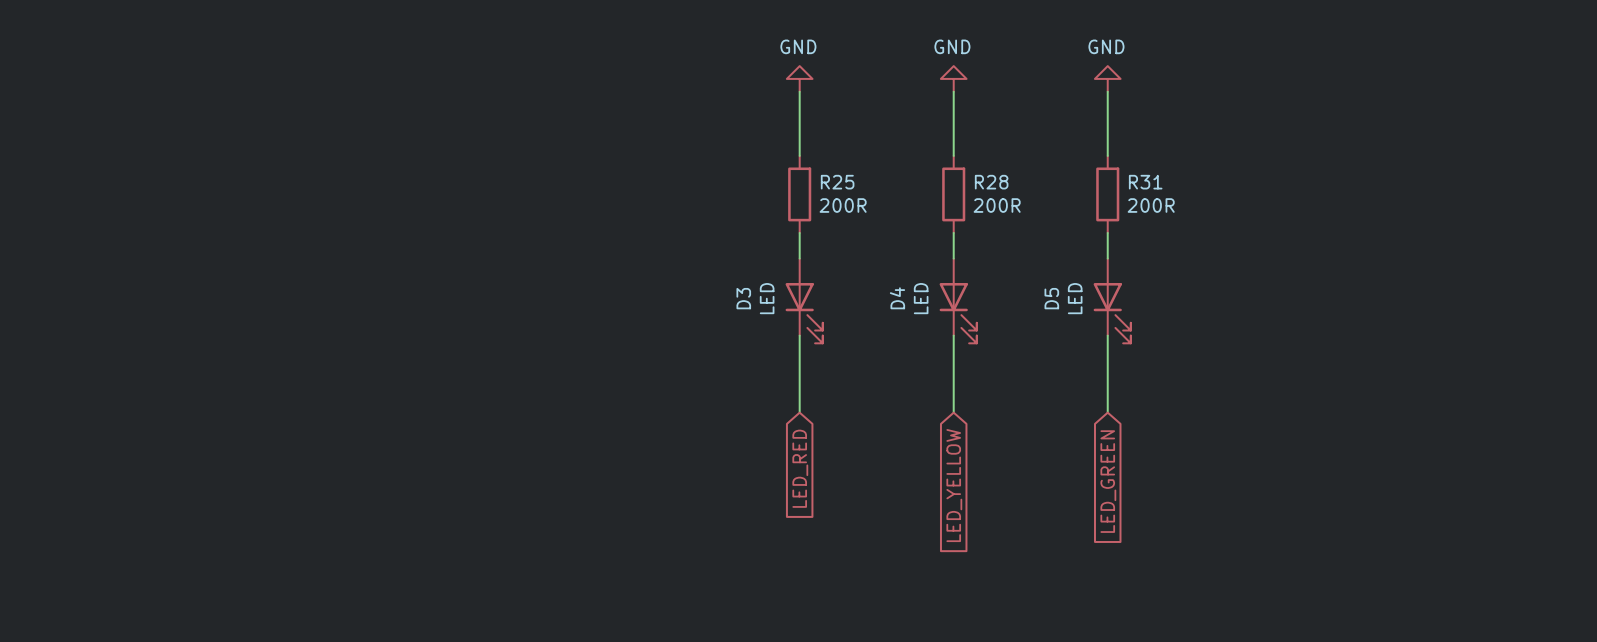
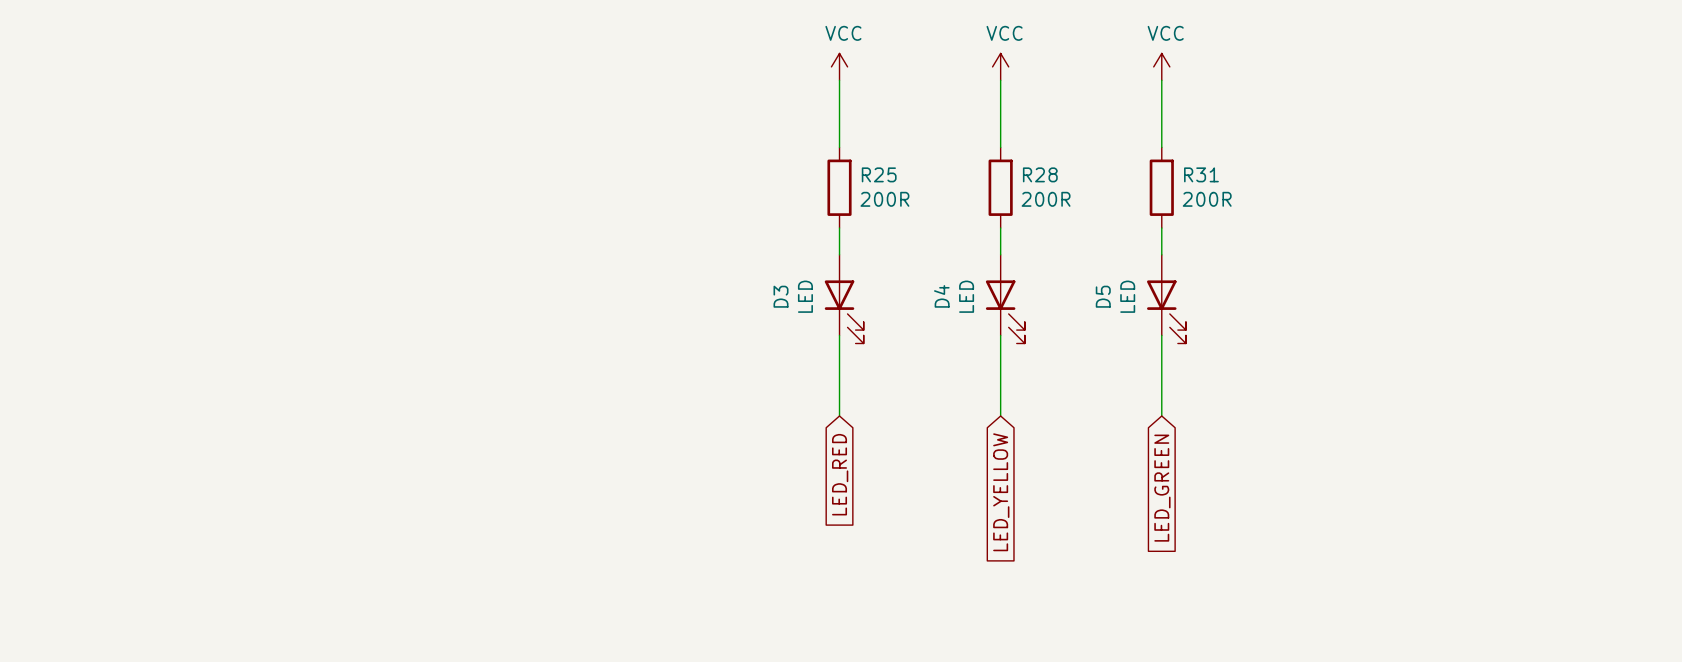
power symbol: GND (799, 78) -> VCC (839, 66)
power symbol: GND (953, 78) -> VCC (1000, 66)
power symbol: GND (1107, 78) -> VCC (1161, 66)

